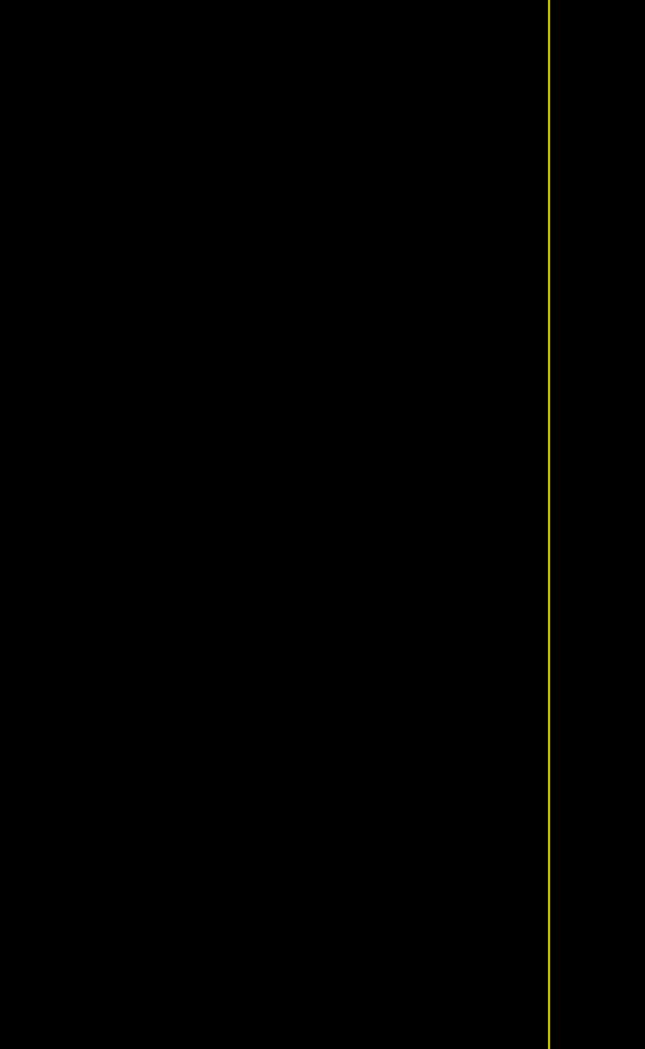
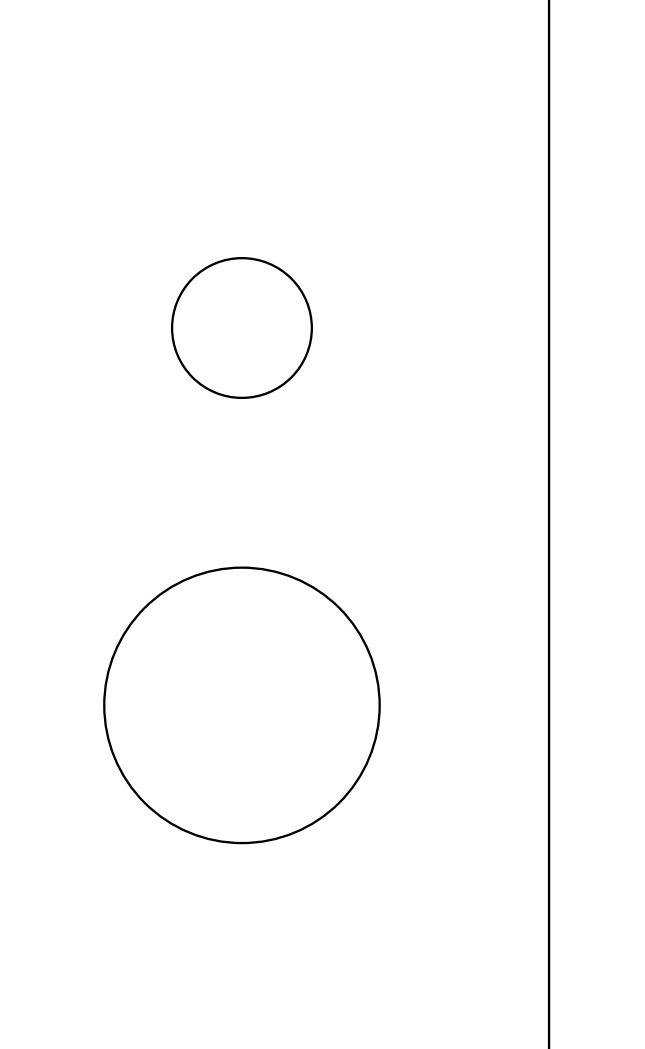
round board edge: none -> [170, 257, 313, 400]
round board edge: none -> [103, 566, 381, 845]

